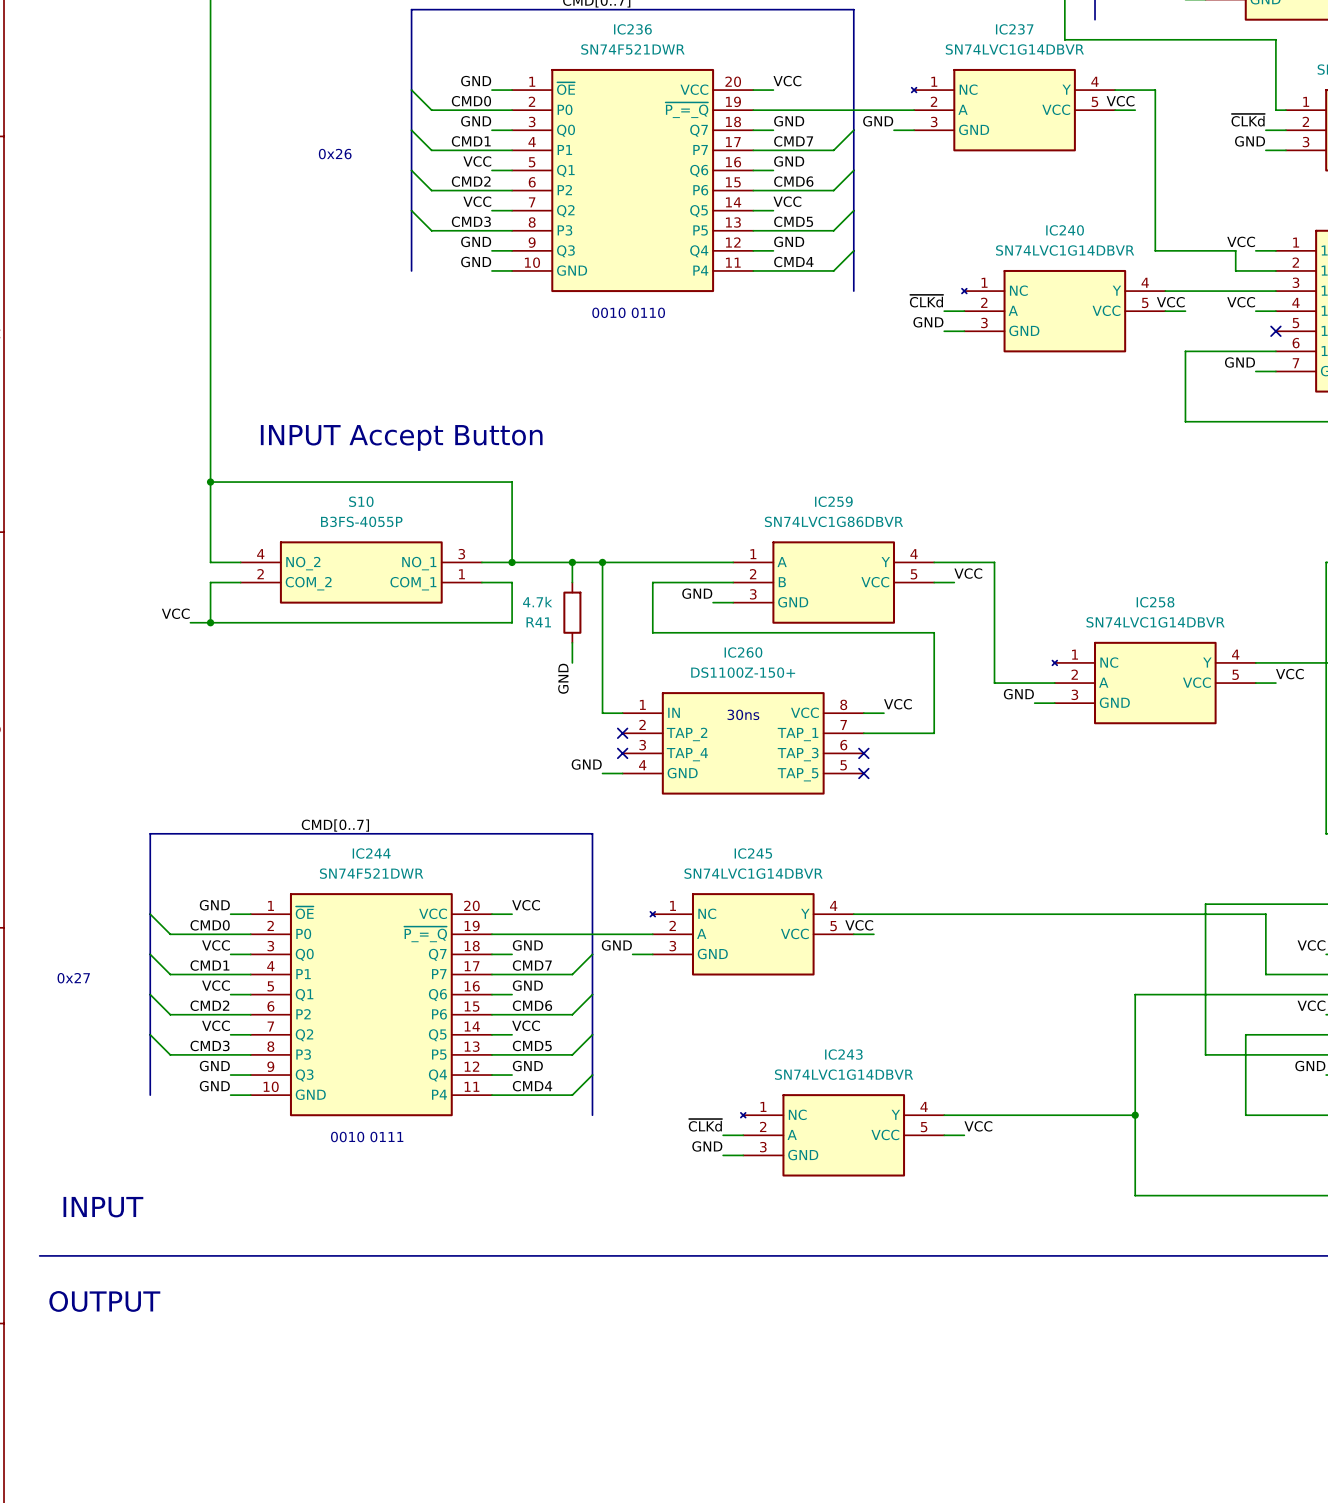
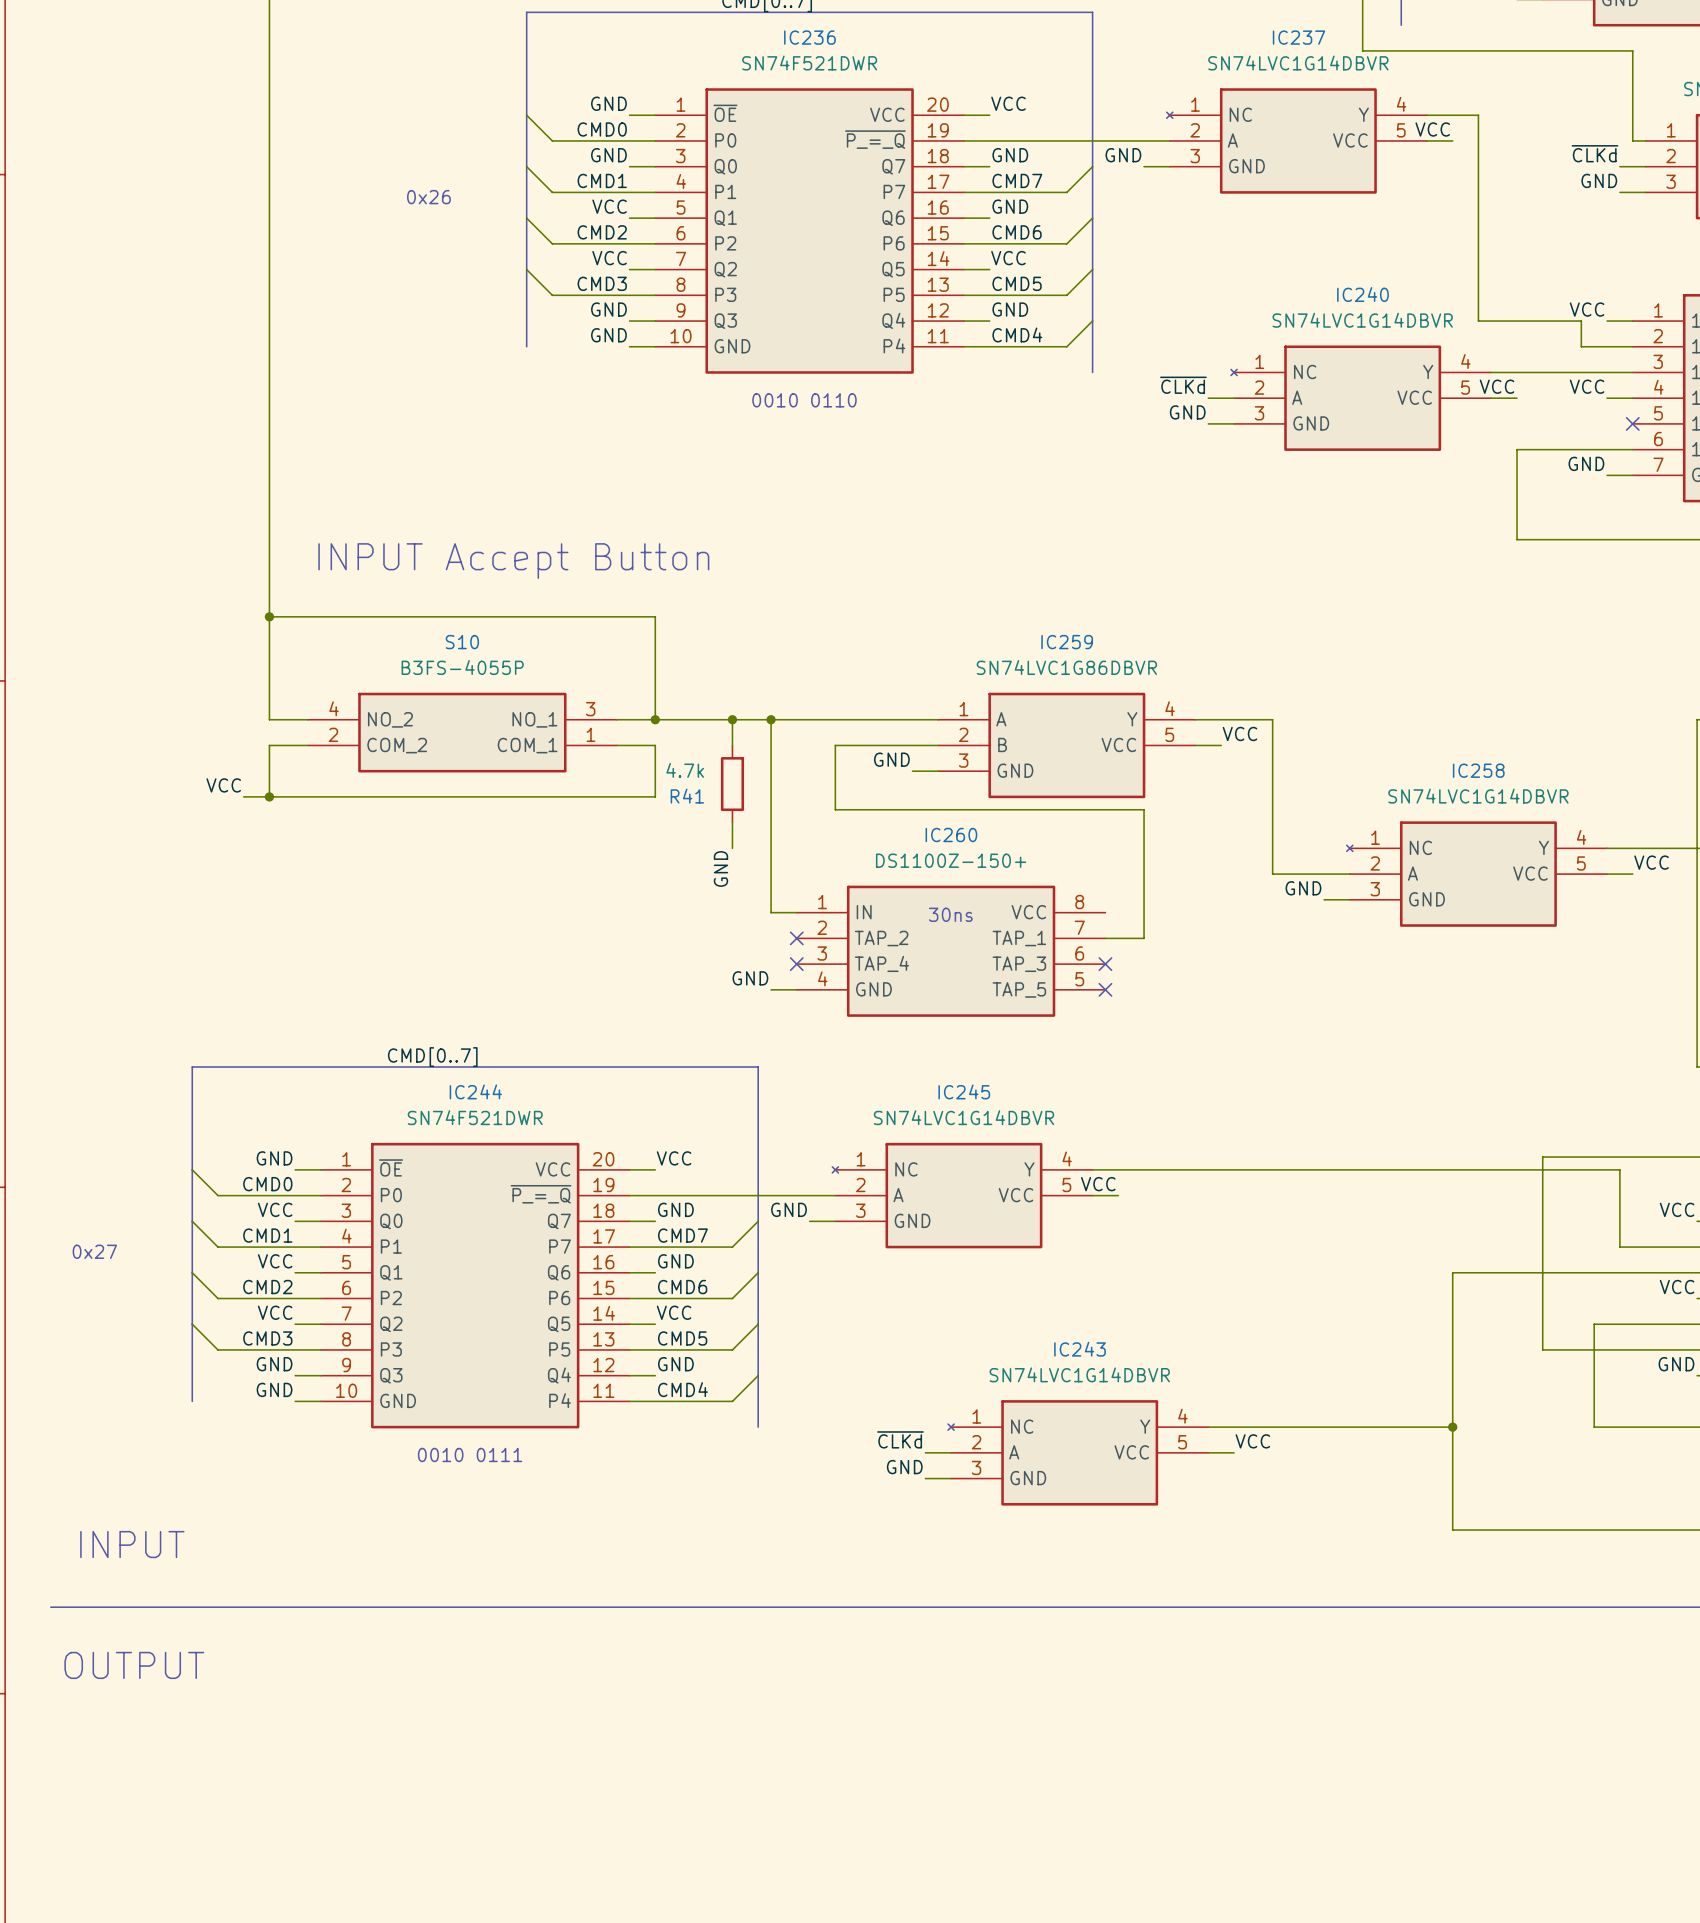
wire: (893, 632) (934, 632) (934, 733) (893, 733) -> (1144, 809) (1144, 938)
label: VCC (897, 704) -> none
wire: (863, 713) (883, 713) -> none

